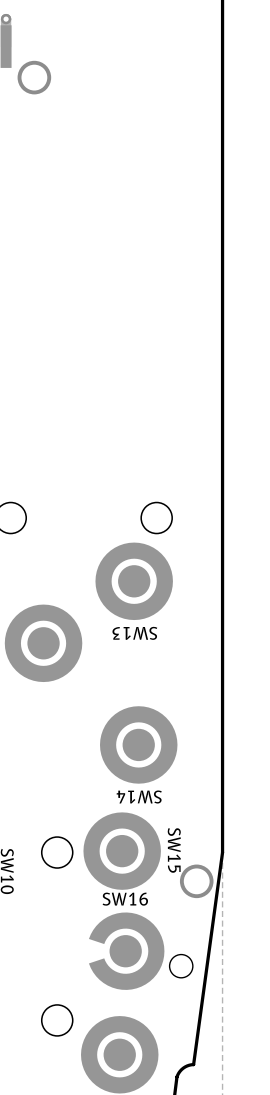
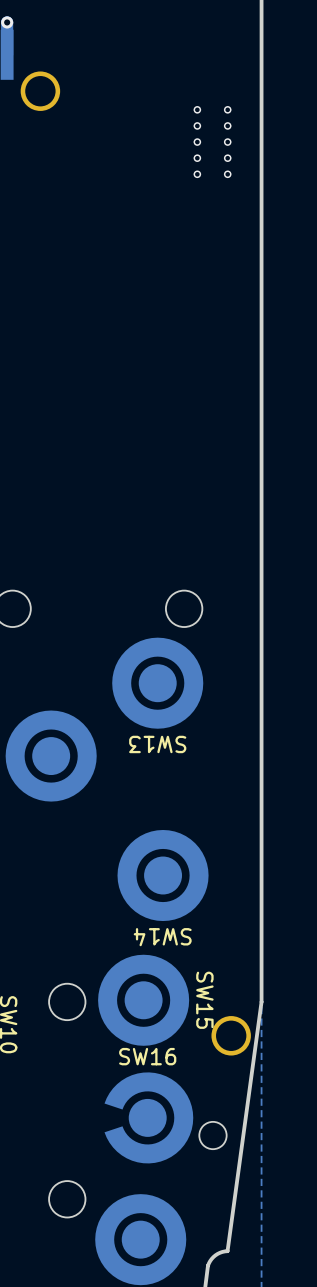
via: none -> (197, 109)
via: none -> (227, 109)
via: none -> (197, 125)
via: none -> (227, 125)
via: none -> (197, 142)
via: none -> (227, 142)
via: none -> (197, 158)
via: none -> (227, 158)
via: none -> (197, 174)
via: none -> (227, 174)

